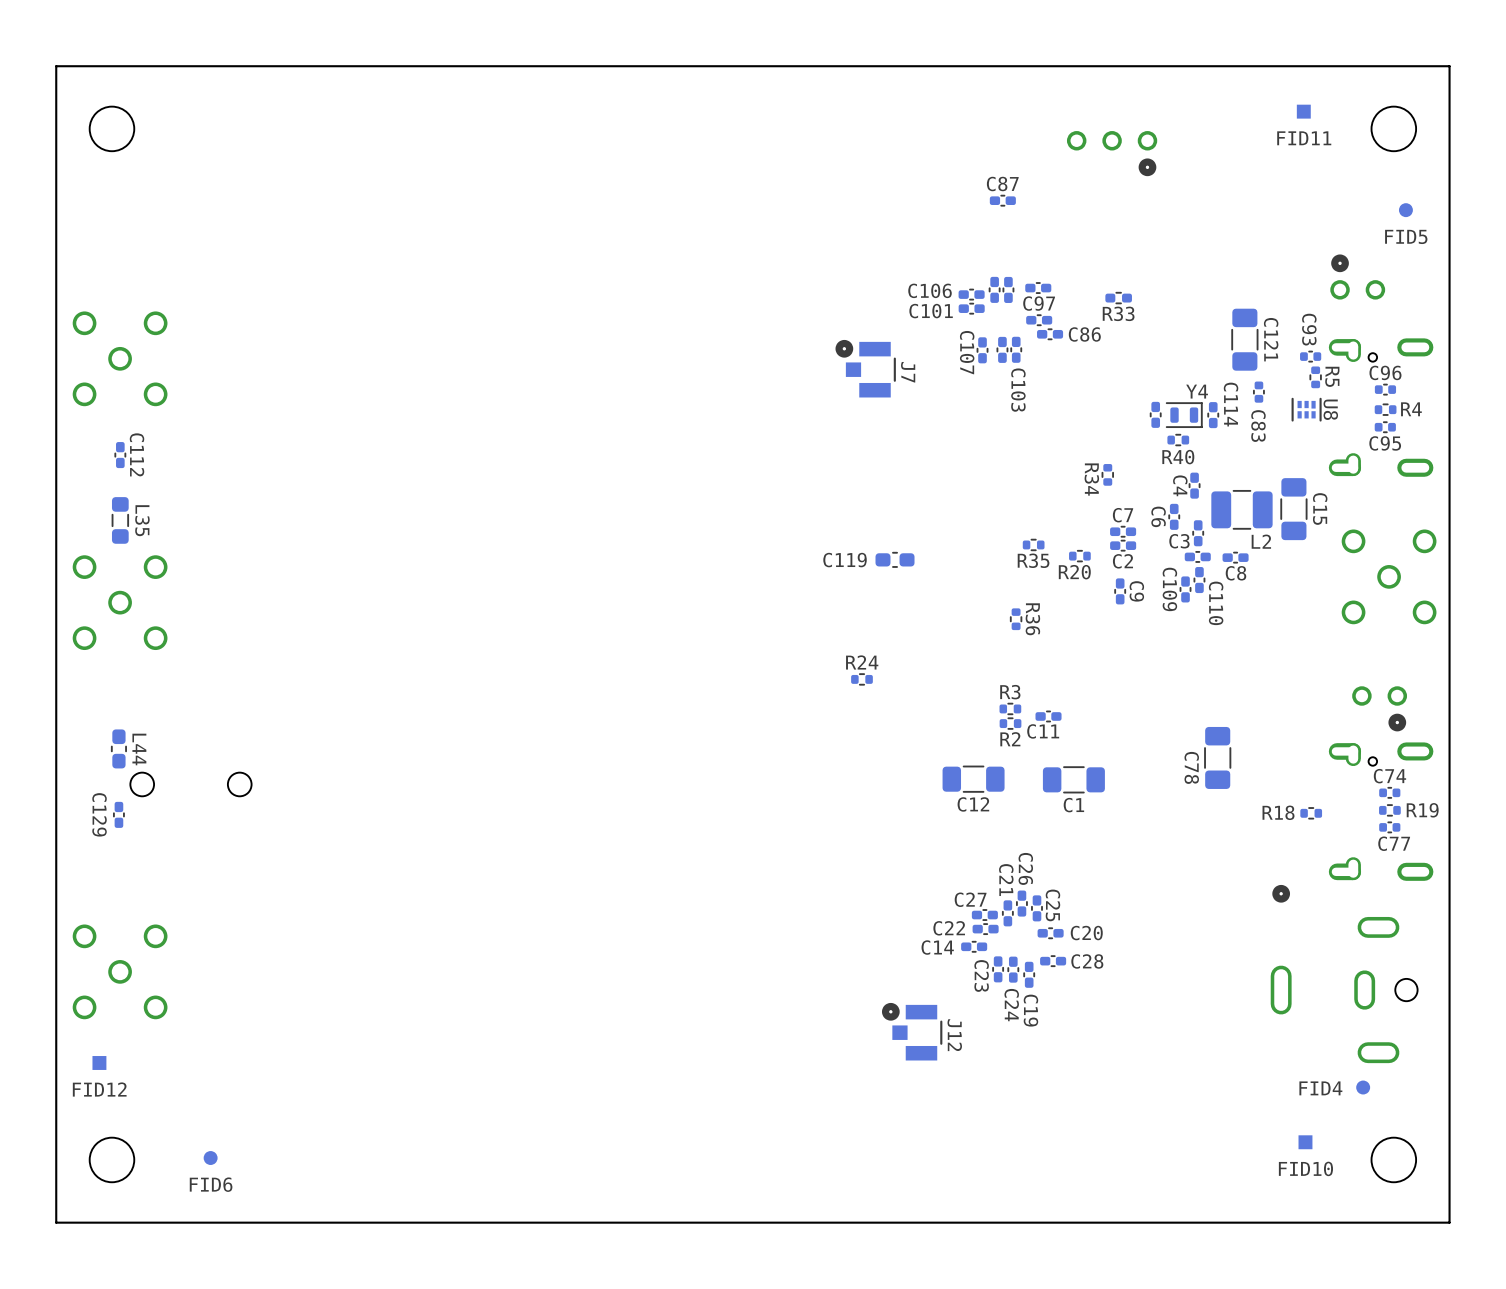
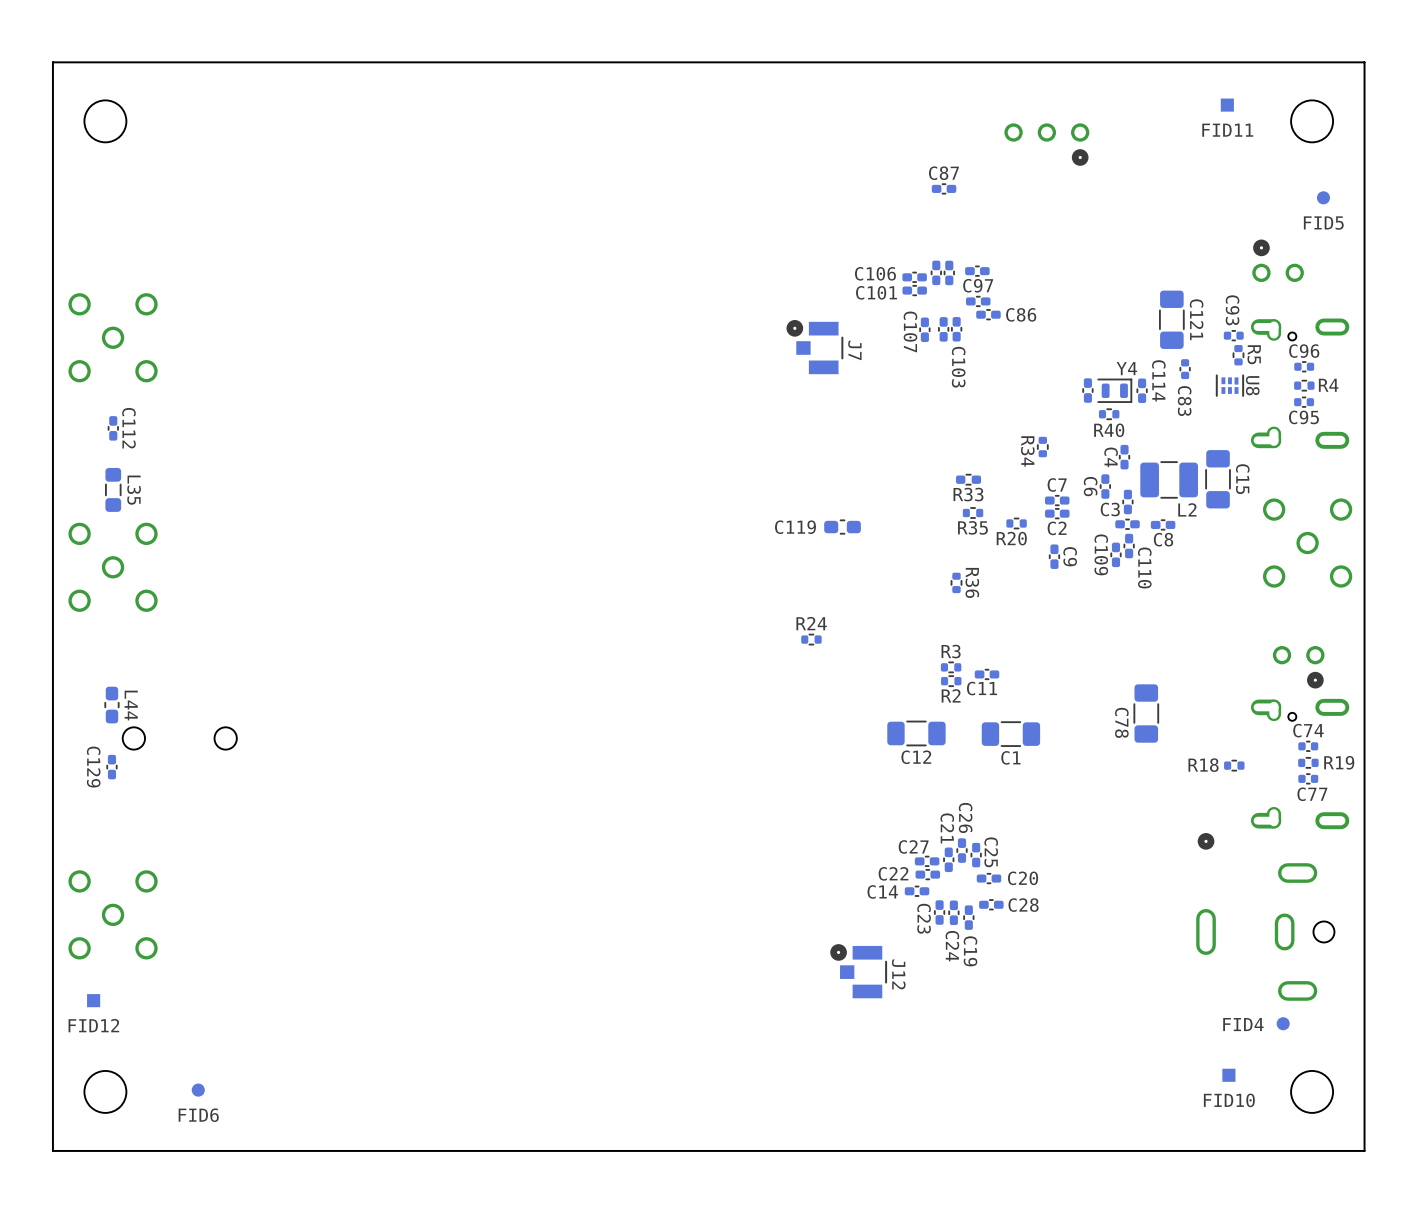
R33 position: (1118, 298) -> (968, 479)

